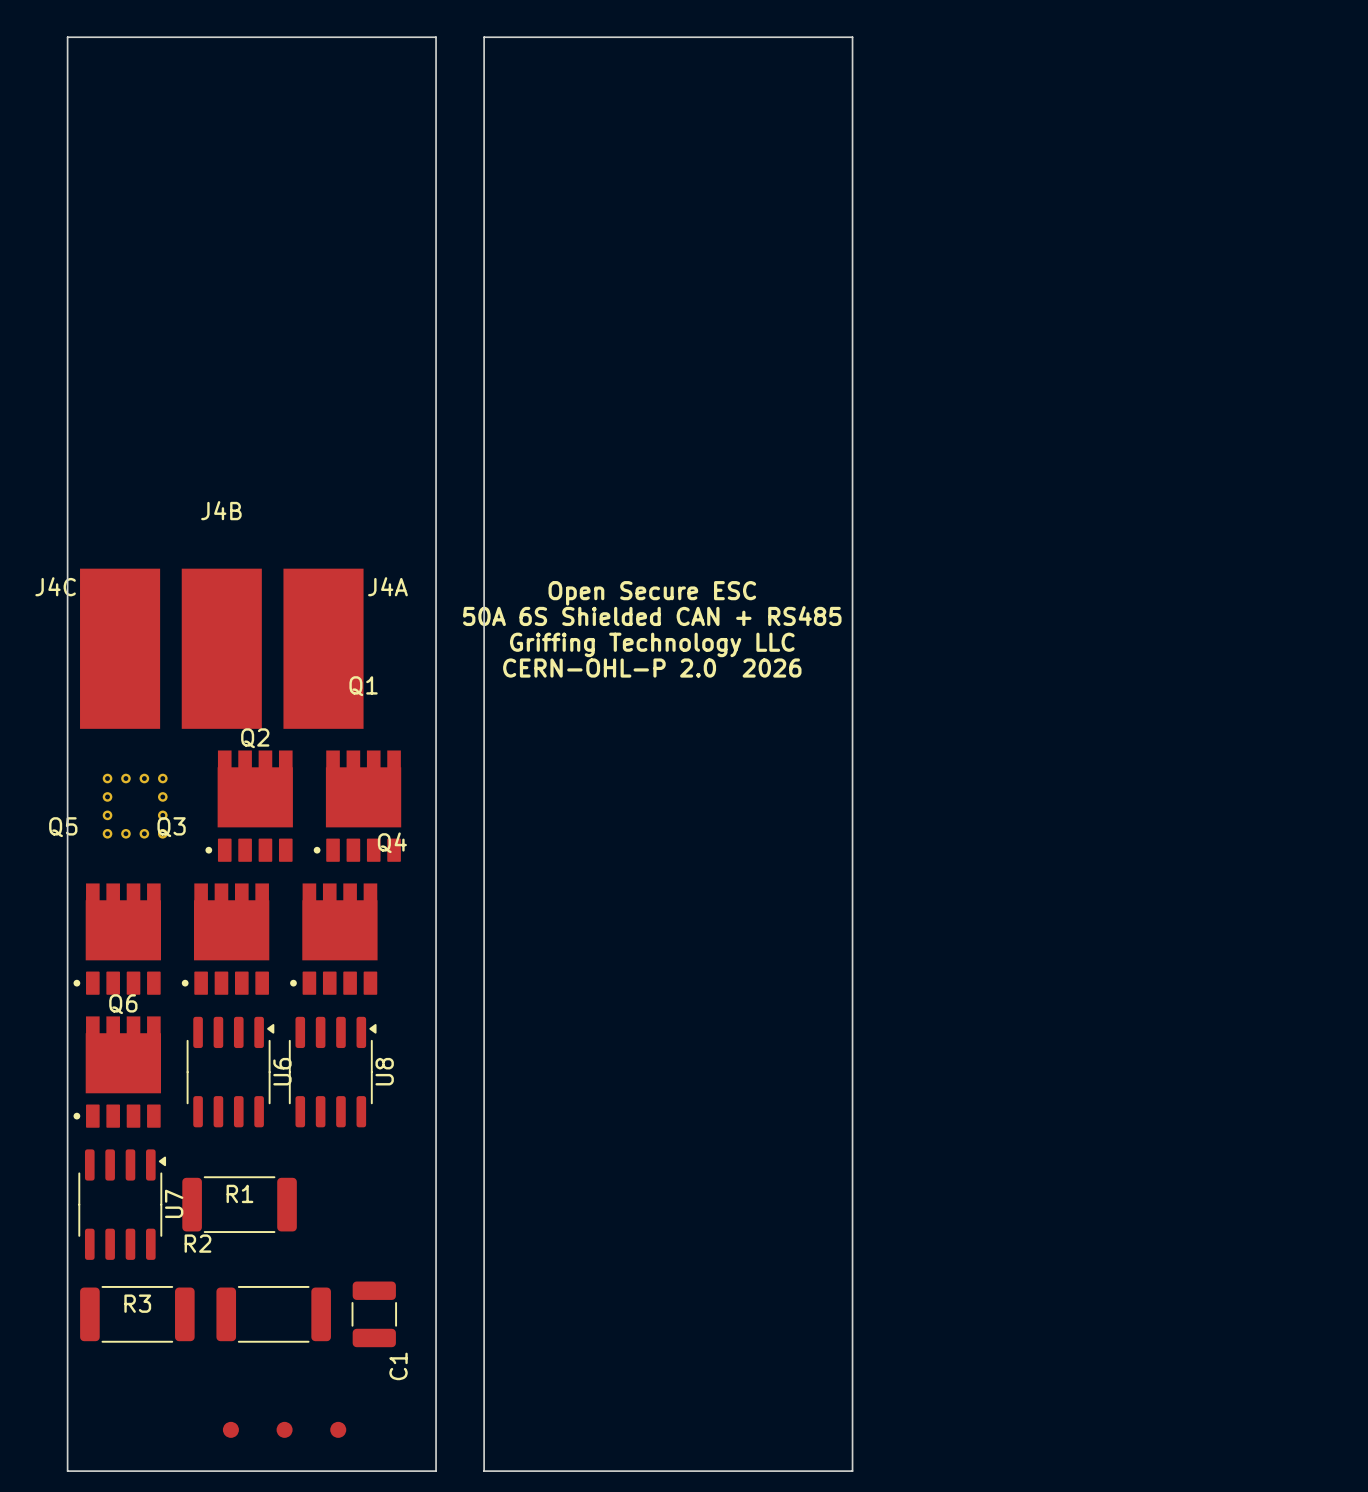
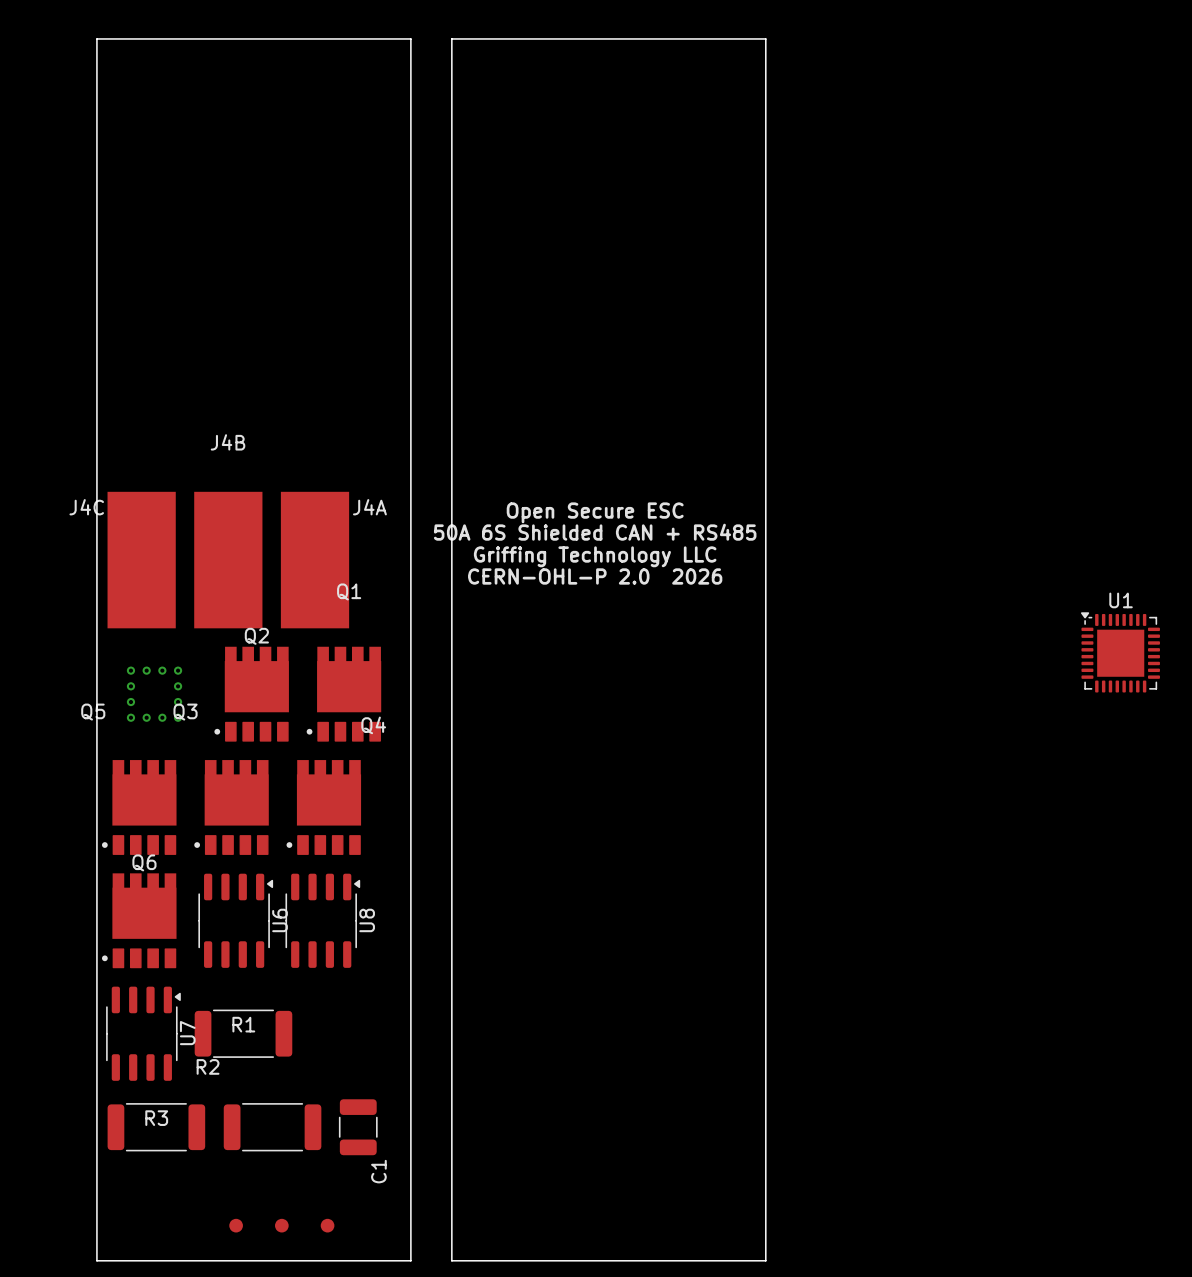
U1: none -> (1120, 652)

